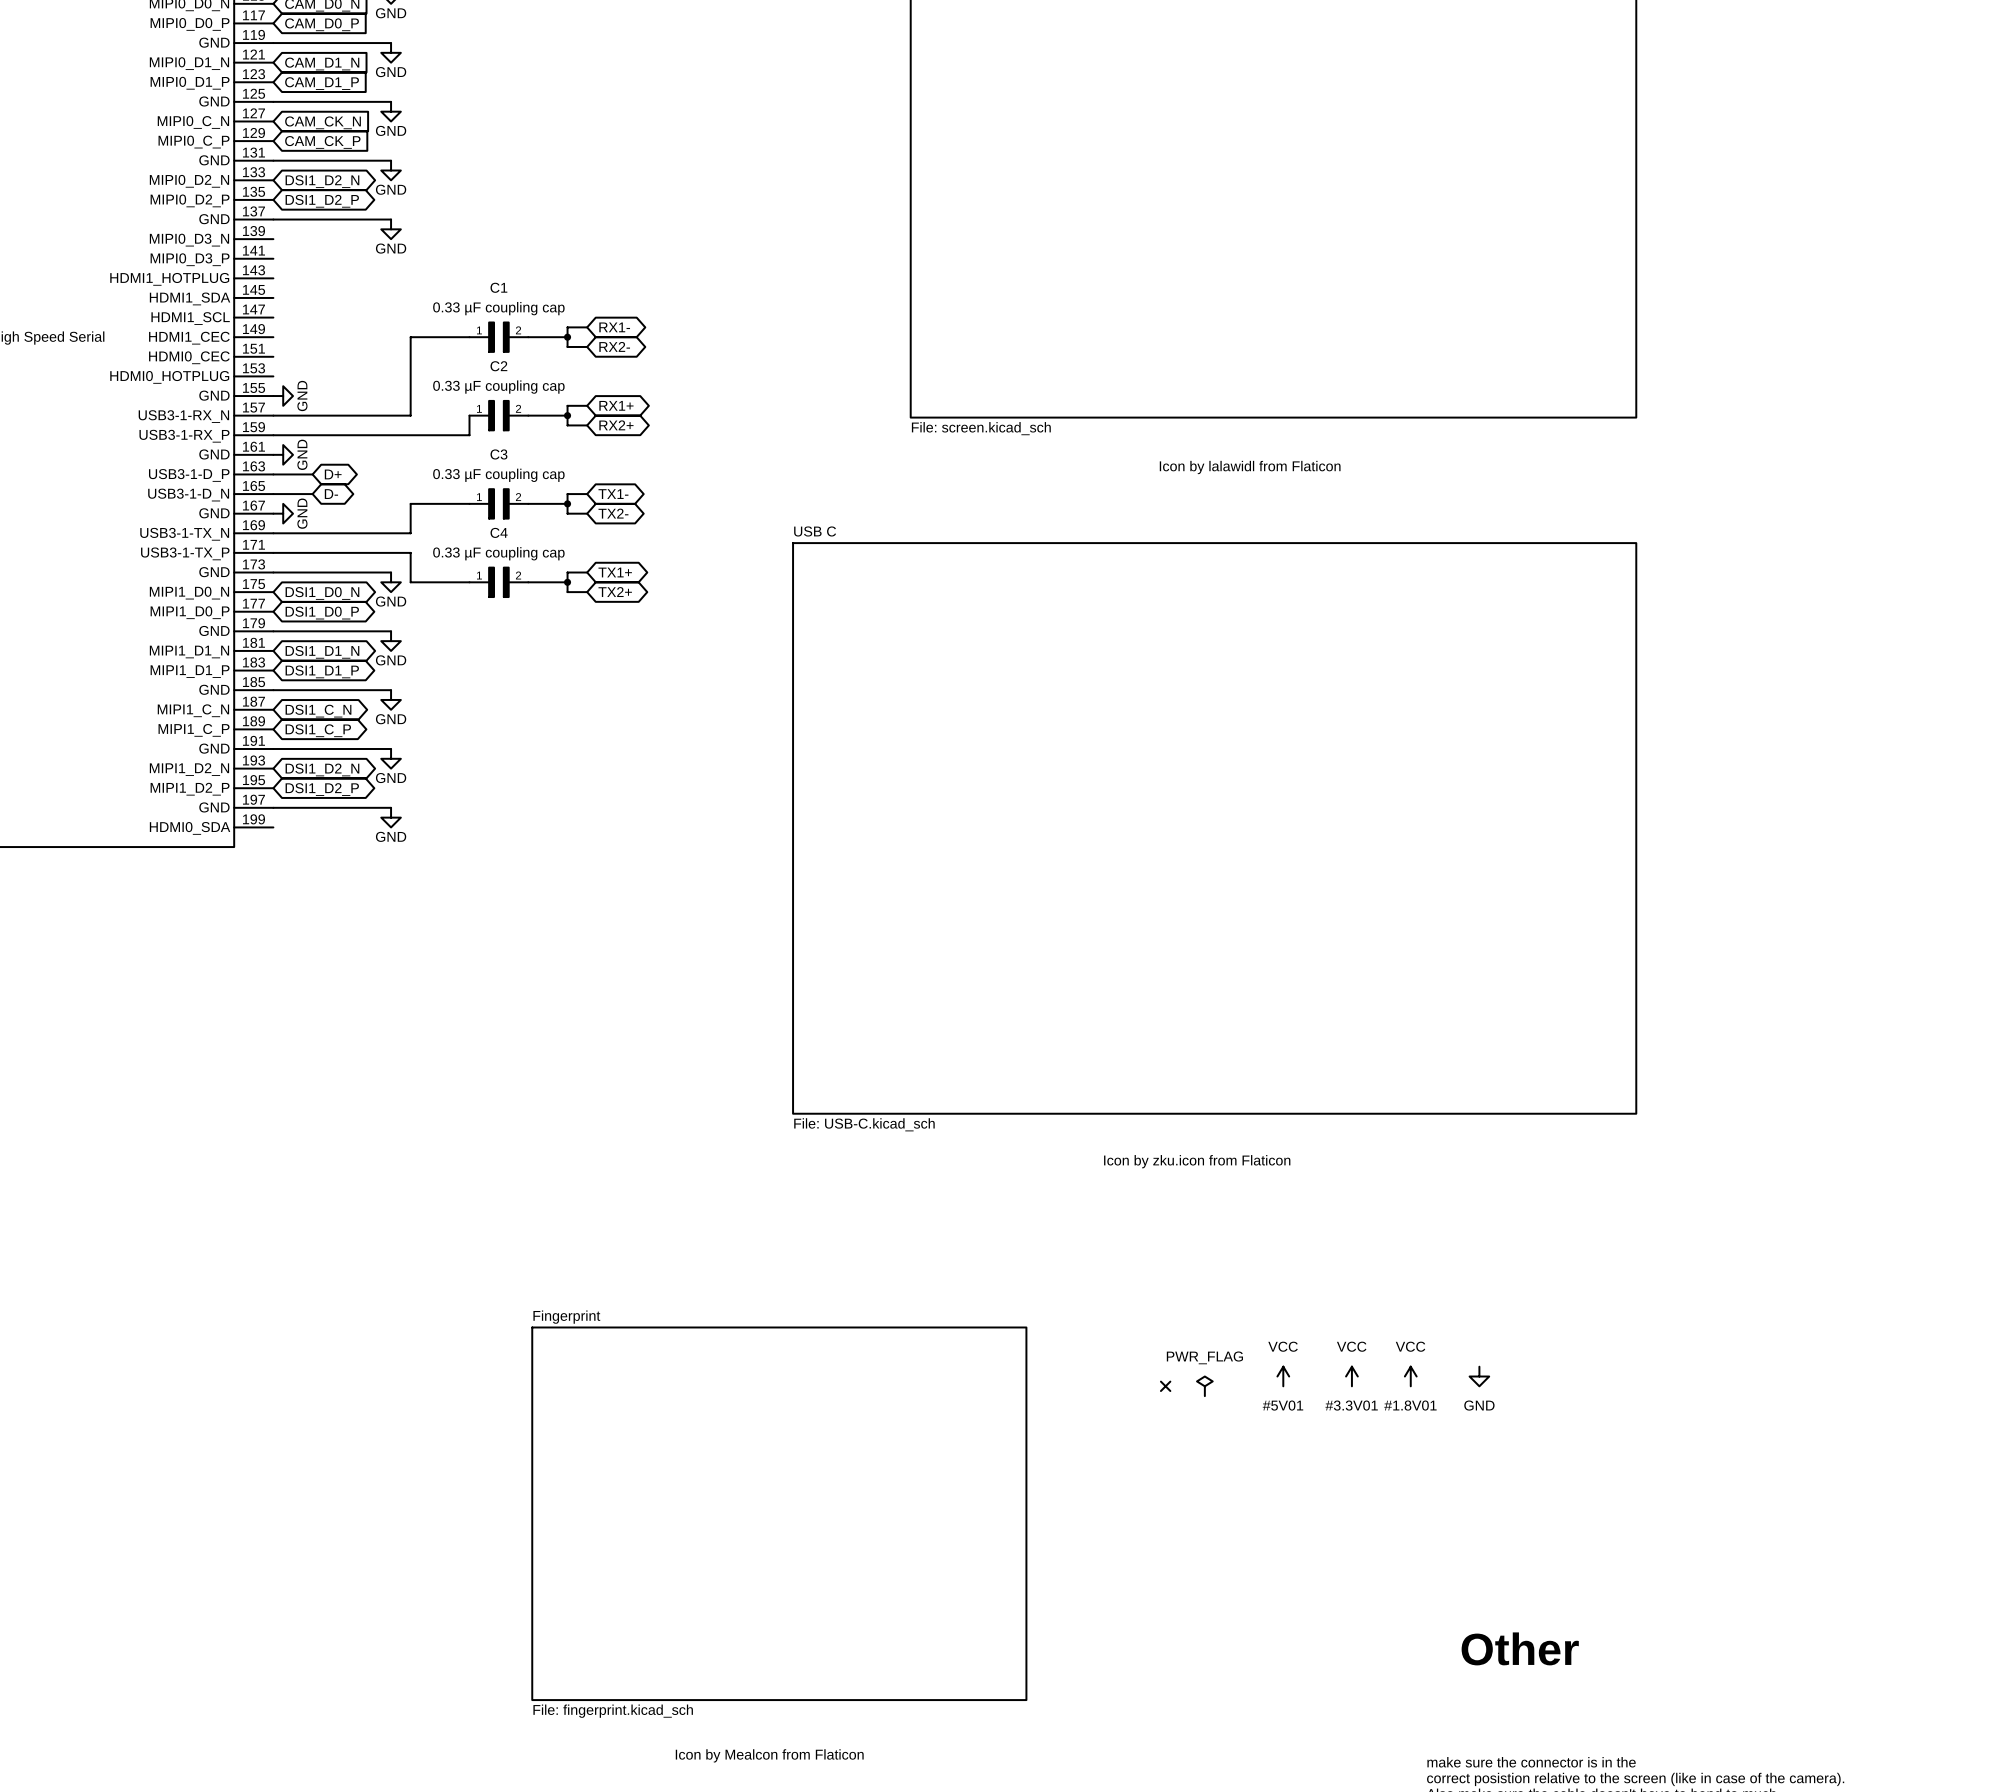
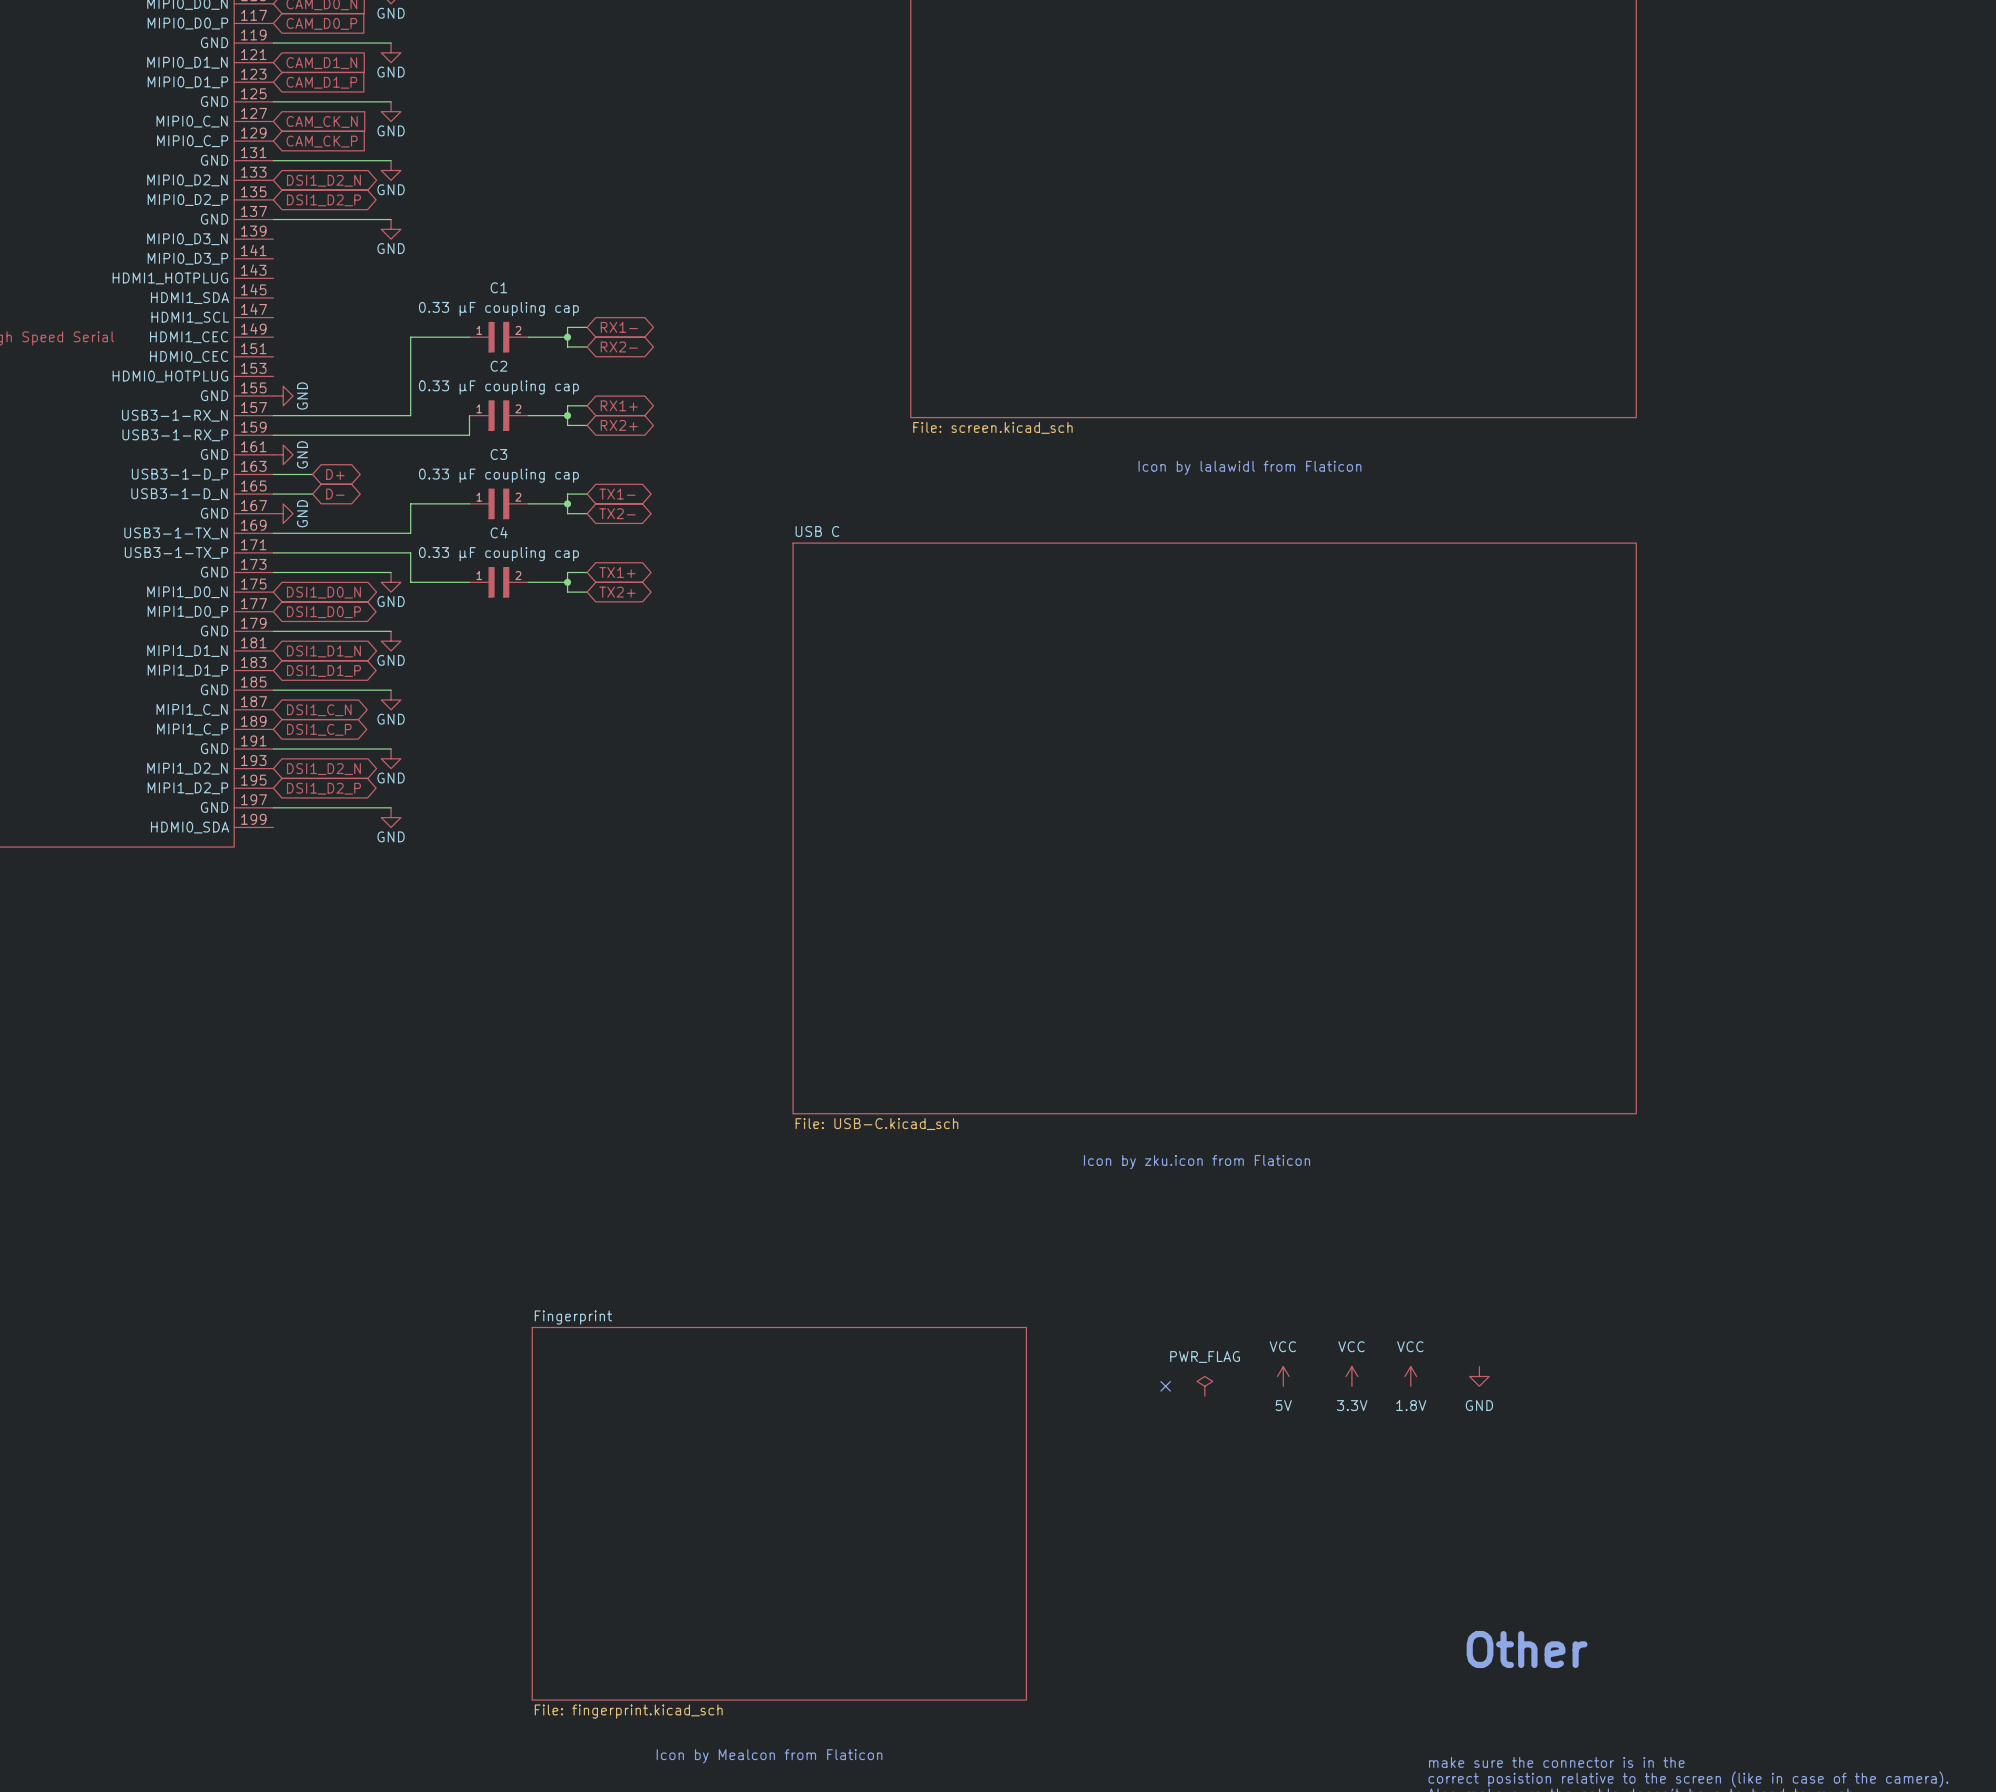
#5V01 name: #5V01 (1282, 1405) -> 5V (1283, 1405)
#3.3V01 name: #3.3V01 (1351, 1405) -> 3.3V (1352, 1405)
#1.8V01 name: #1.8V01 (1410, 1405) -> 1.8V (1411, 1405)

